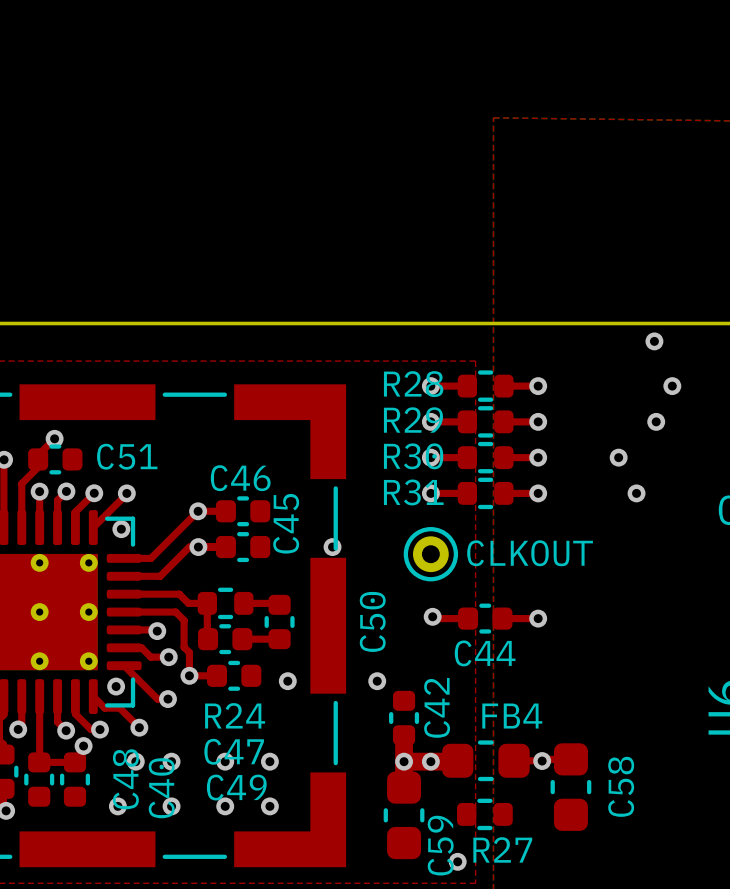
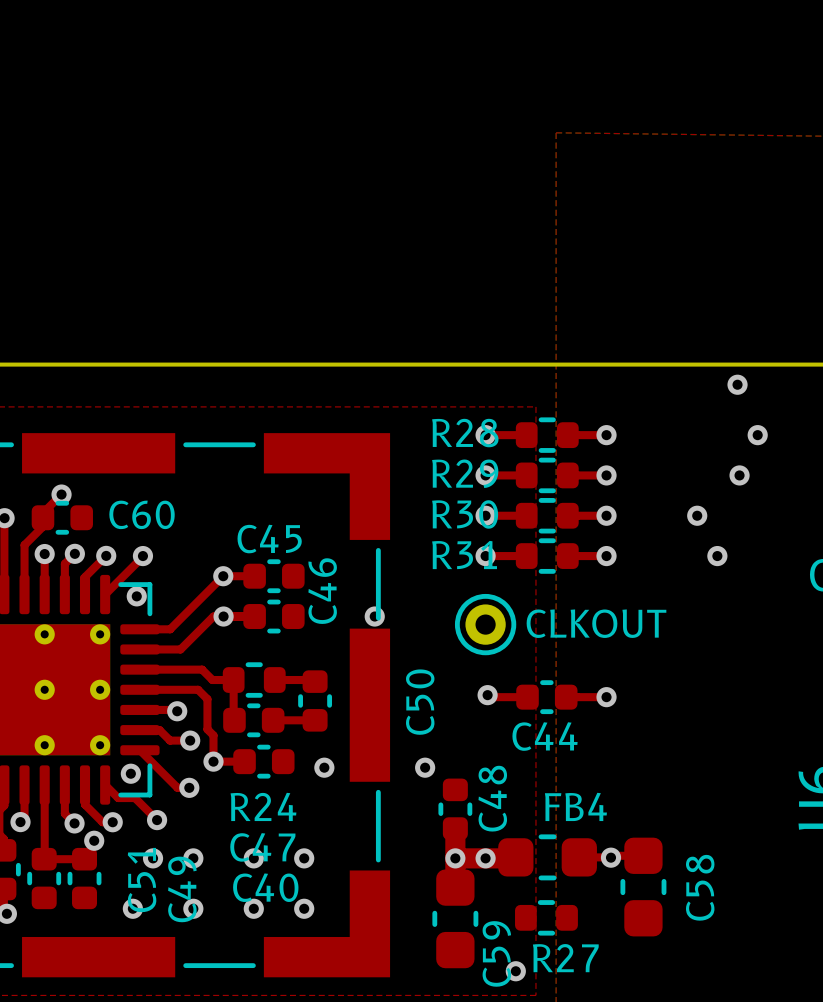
C51 name: C51 (127, 456) -> C60 (142, 514)
C46 name: C46 (240, 478) -> C45 (269, 539)
C45 name: C45 (286, 523) -> C46 (322, 591)
C42 name: C42 (437, 707) -> C48 (492, 798)
C48 name: C48 (125, 779) -> C51 (142, 880)
C49 name: C49 (236, 787) -> C40 (265, 887)
C40 name: C40 (161, 788) -> C49 (182, 889)

